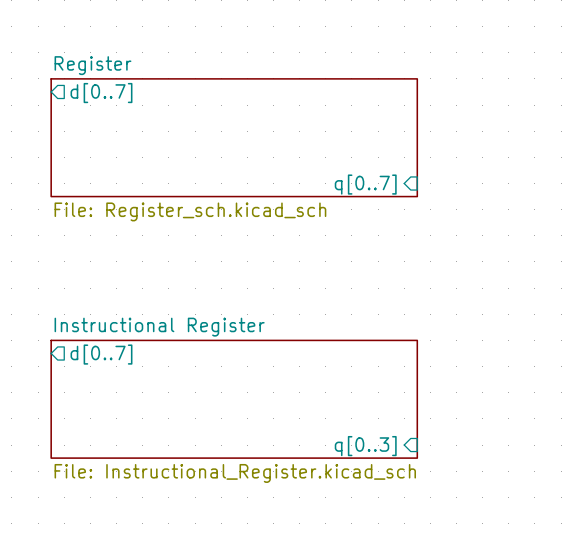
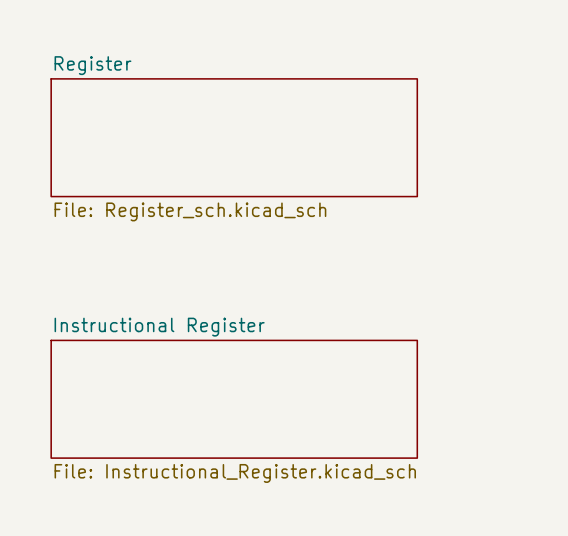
sheet pin: d[0..7] (101, 93) -> none
sheet pin: q[0..7] (365, 184) -> none
sheet pin: d[0..7] (101, 354) -> none
sheet pin: q[0..3] (365, 446) -> none

